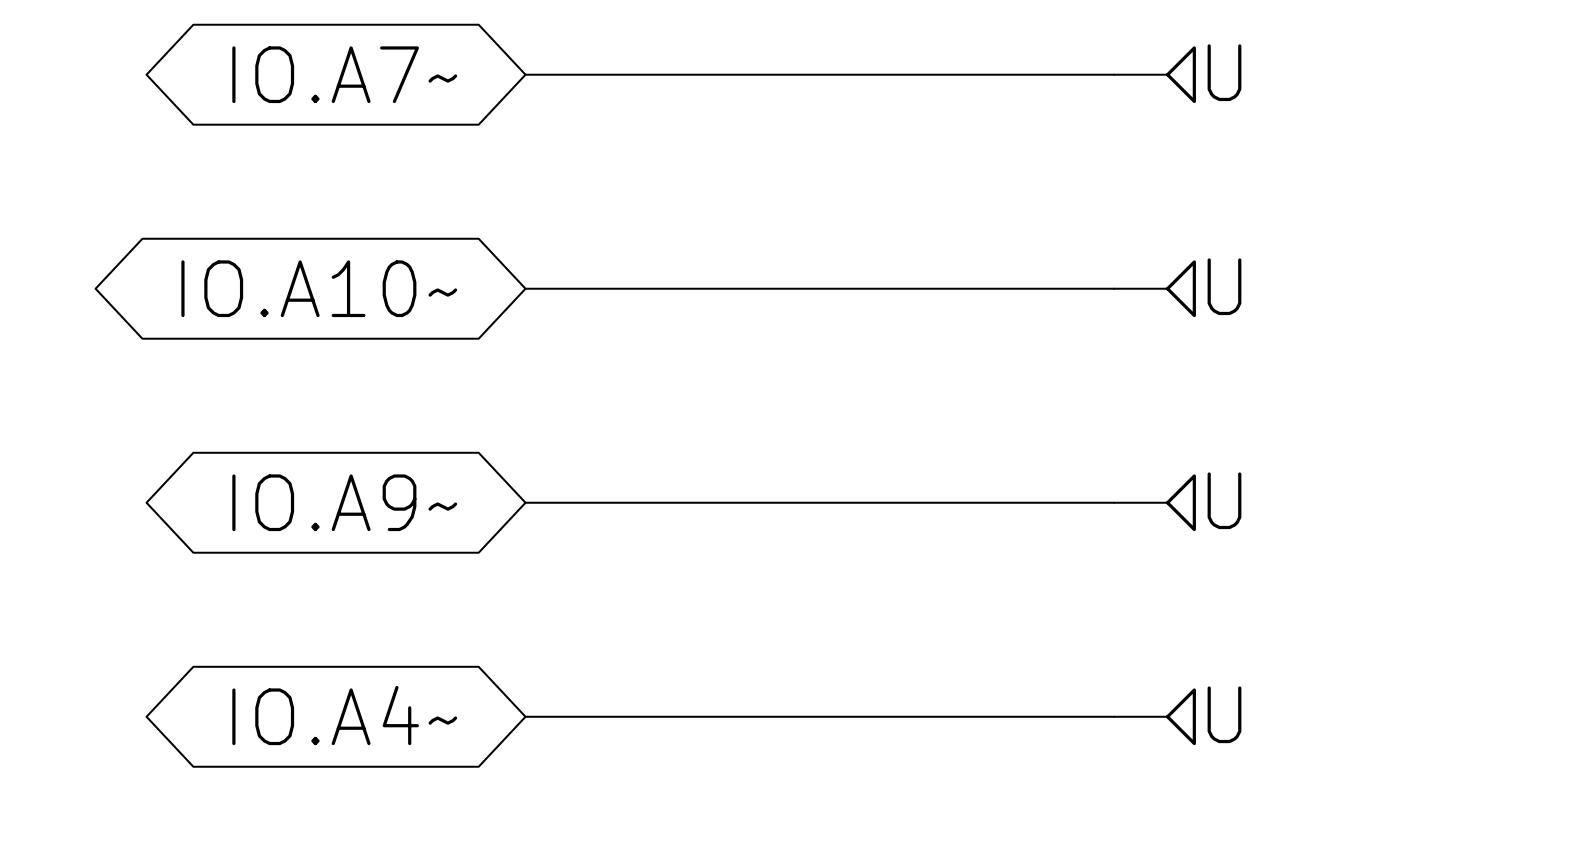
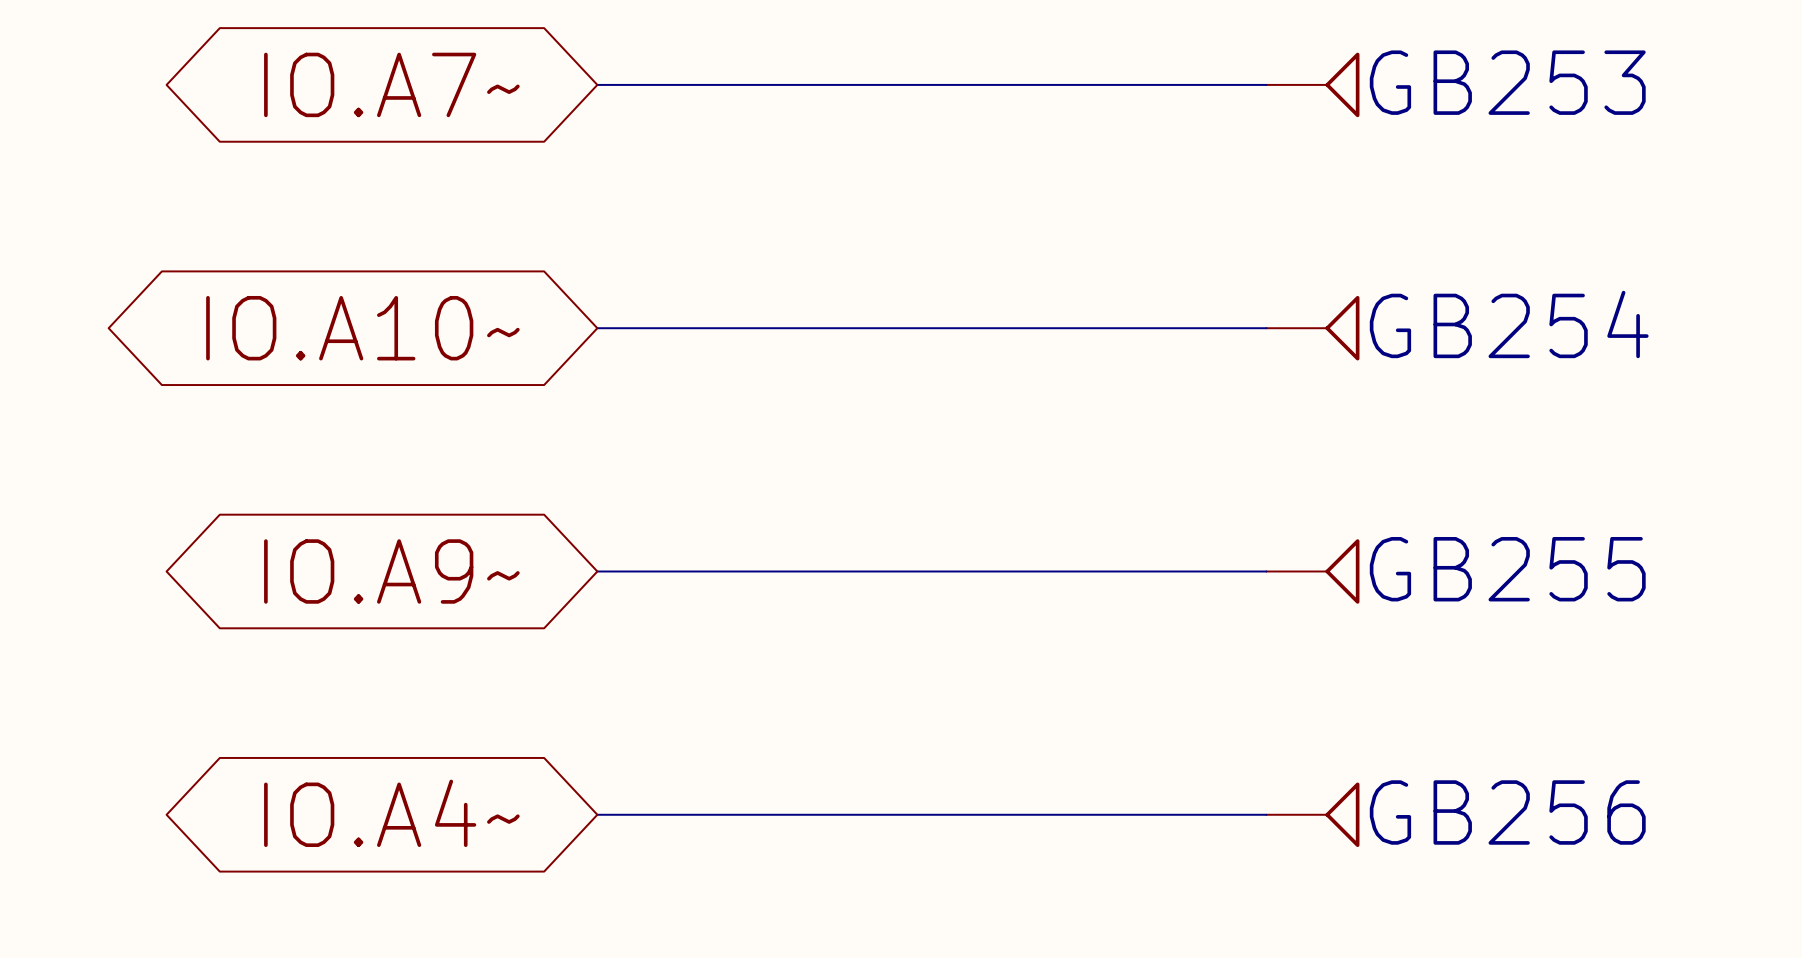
U name: U (1224, 72) -> GB253 (1507, 82)
U name: U (1224, 286) -> GB254 (1509, 324)
U name: U (1224, 500) -> GB255 (1507, 569)
U name: U (1224, 714) -> GB256 (1507, 812)

